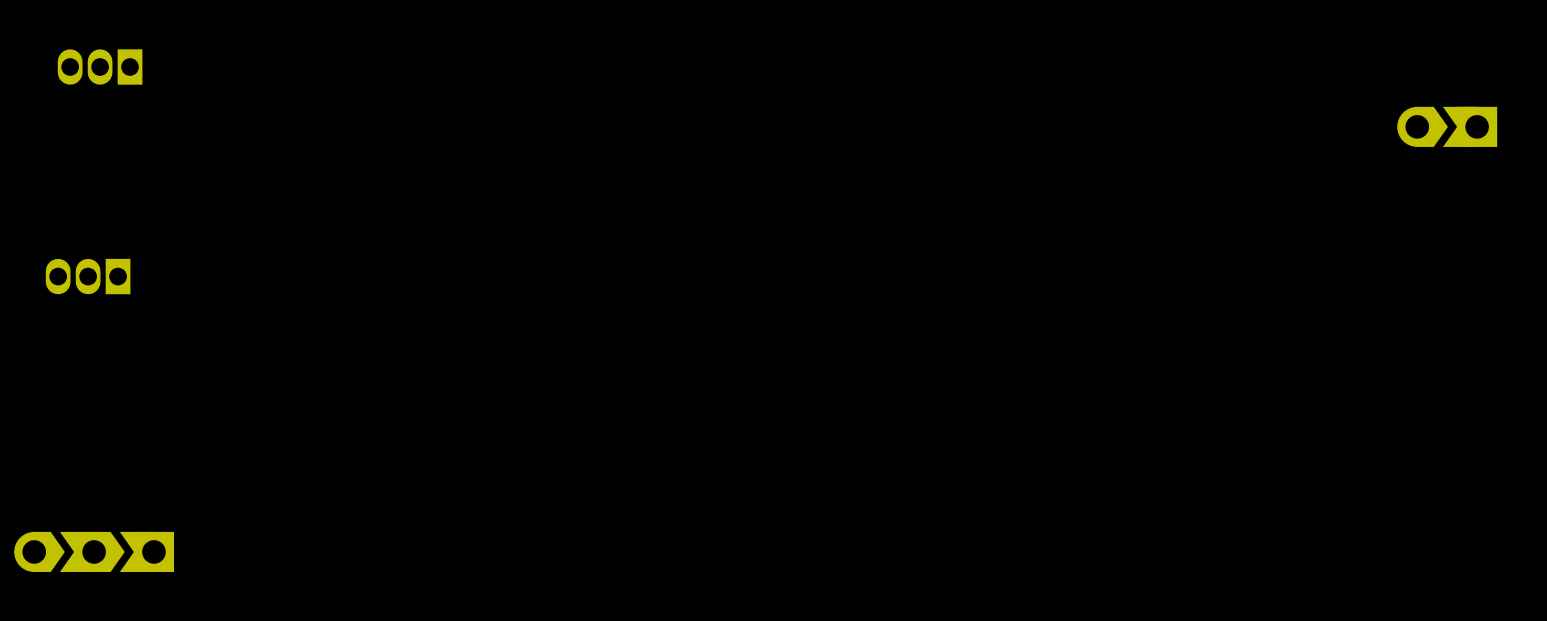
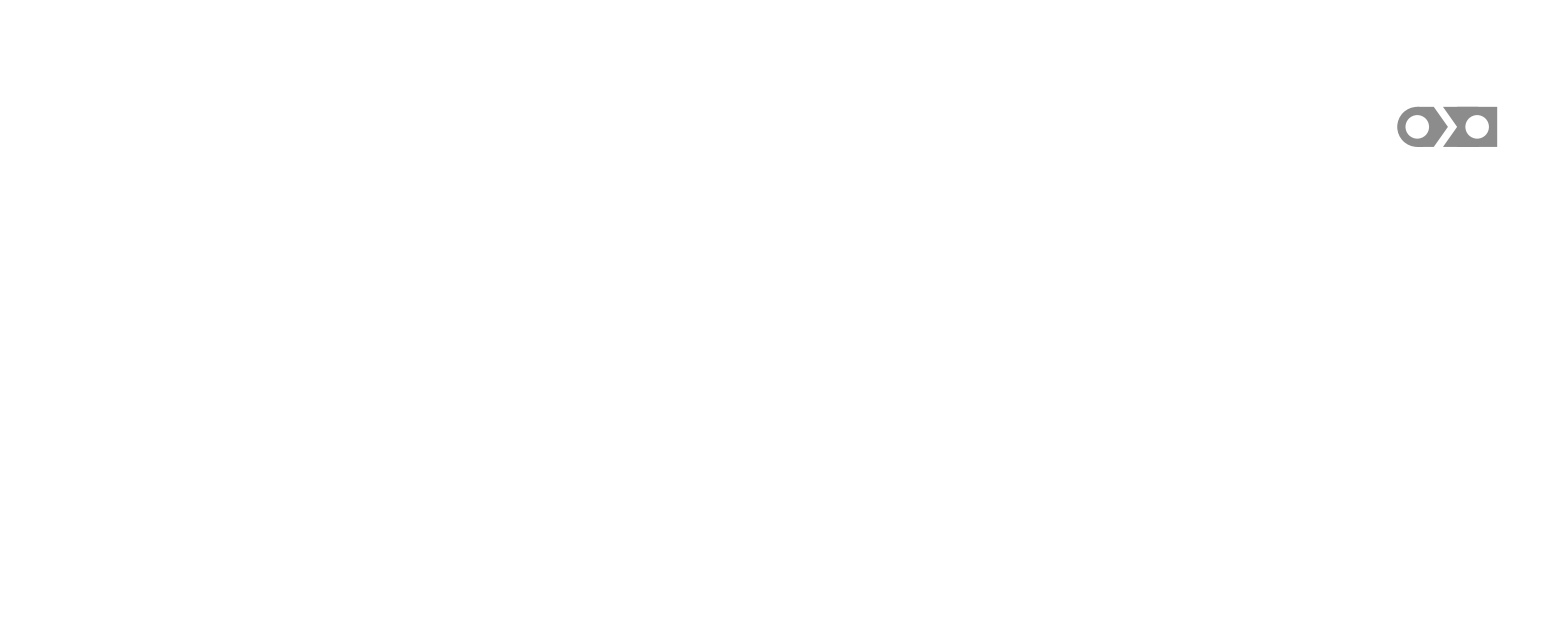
part: (100, 67) -> none
part: (88, 276) -> none
part: (94, 551) -> none

